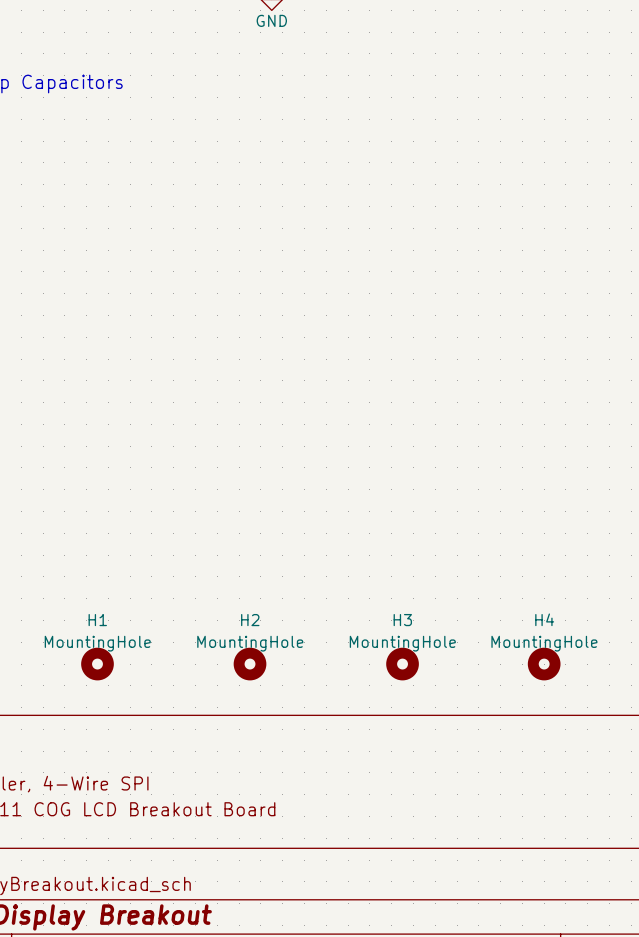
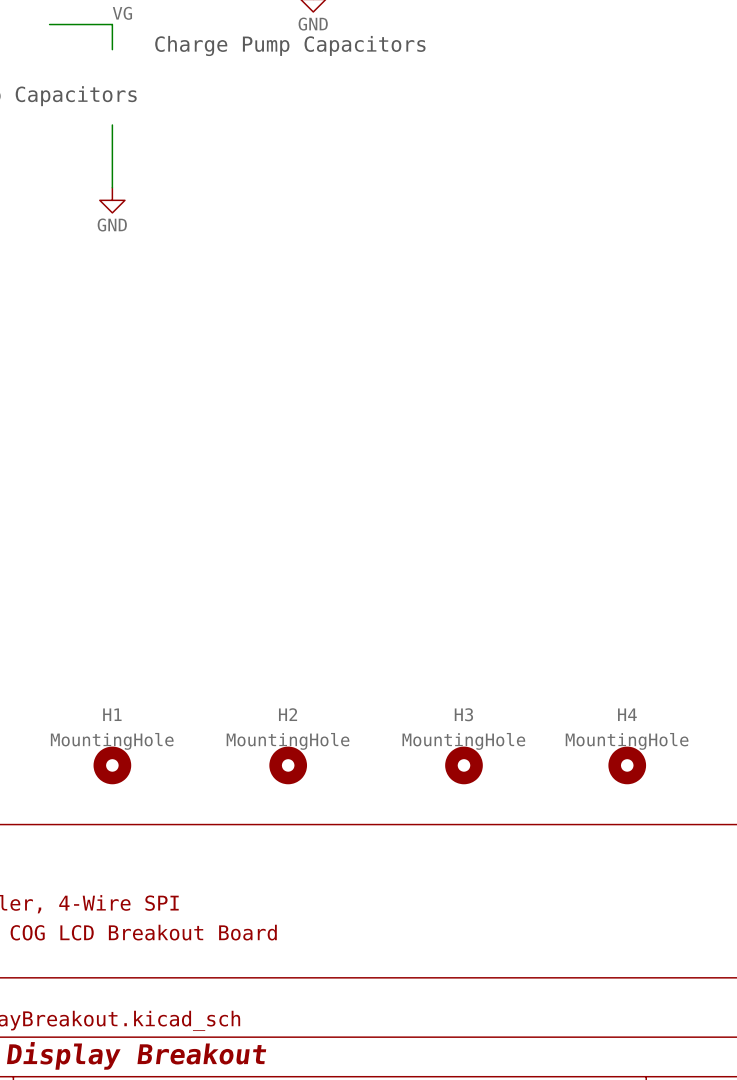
label: none -> VG (122, 13)
wire: none -> (49, 24) (112, 24) (112, 49)
text: none -> Charge Pump Capacitors (290, 46)
wire: none -> (112, 124) (112, 187)
power symbol: none -> GND (112, 200)

